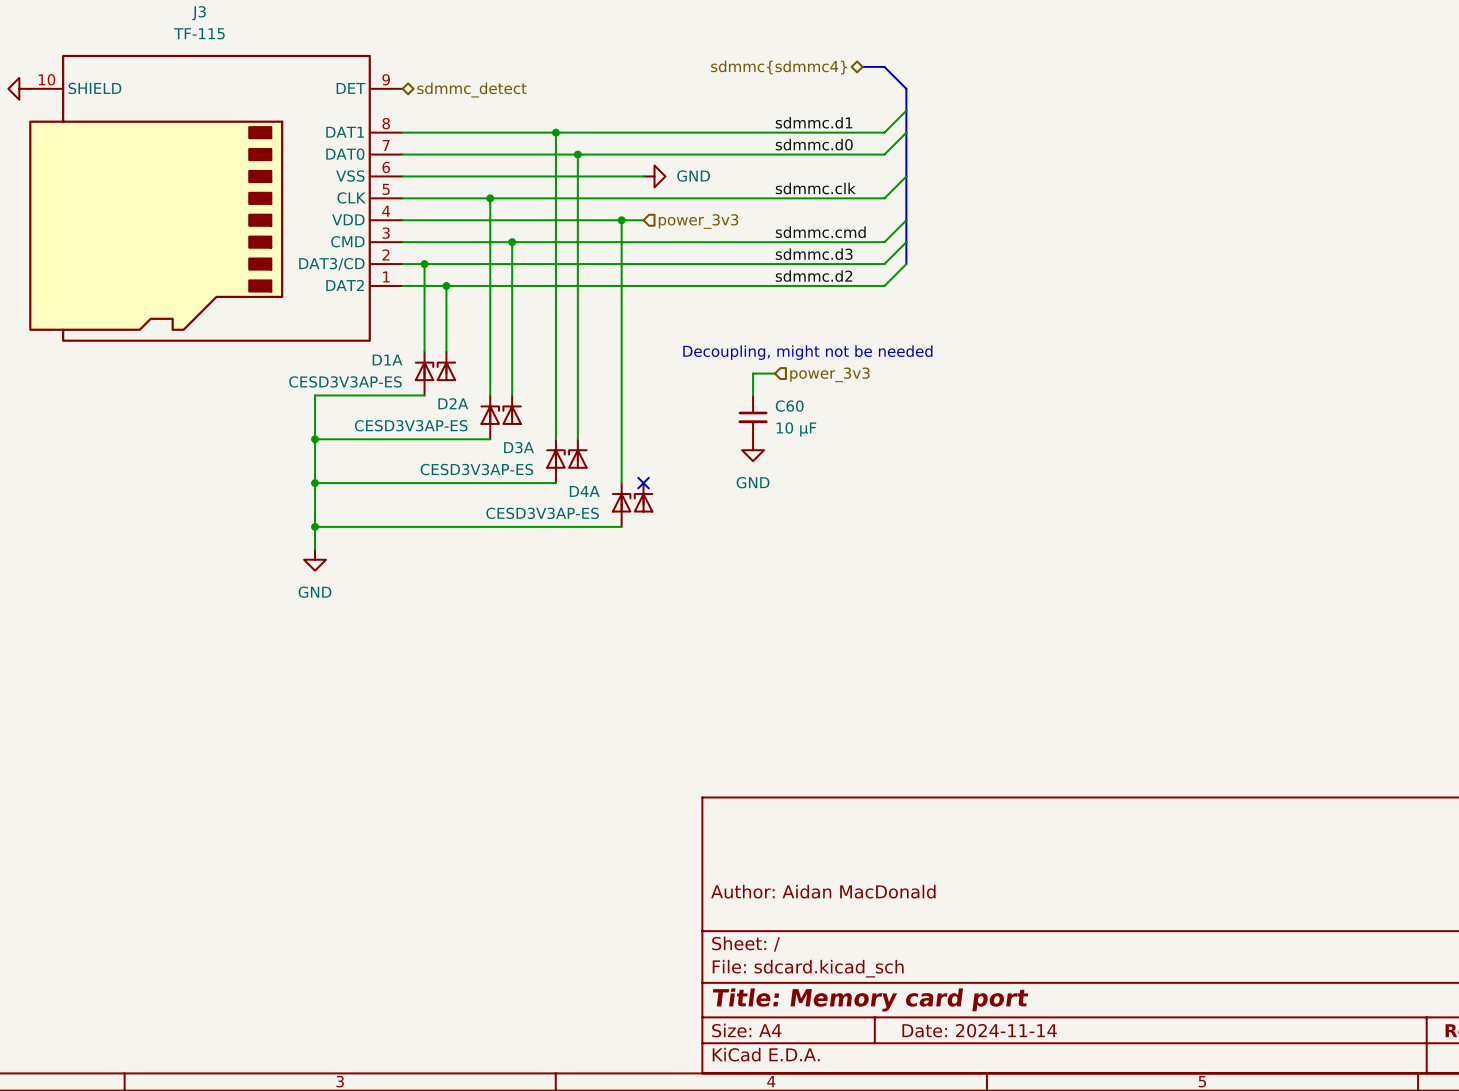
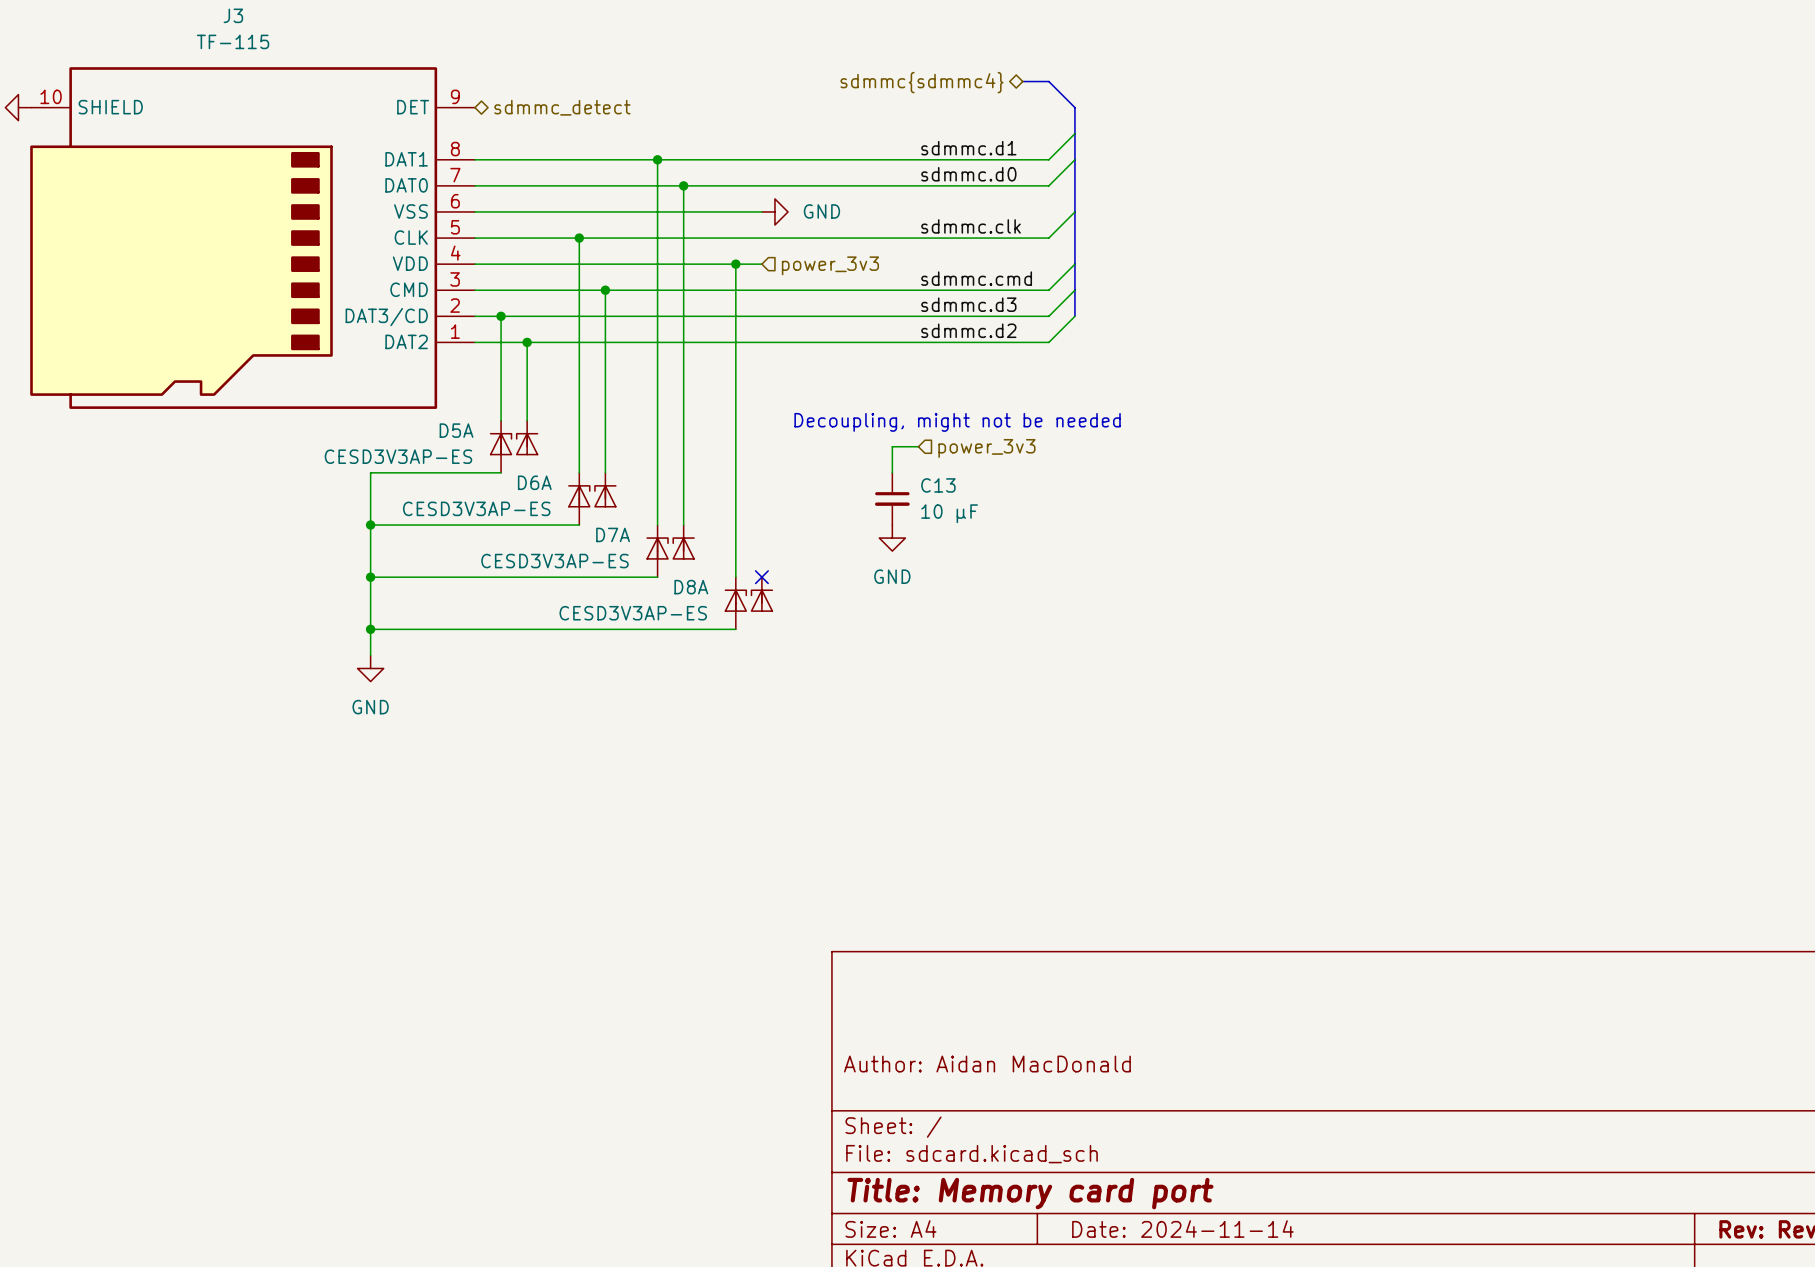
D1A name: D1A (387, 360) -> D5A (456, 430)
D2A name: D2A (453, 403) -> D6A (534, 482)
C60 name: C60 (789, 406) -> C13 (938, 485)
D3A name: D3A (519, 447) -> D7A (613, 534)
D4A name: D4A (584, 491) -> D8A (691, 587)

